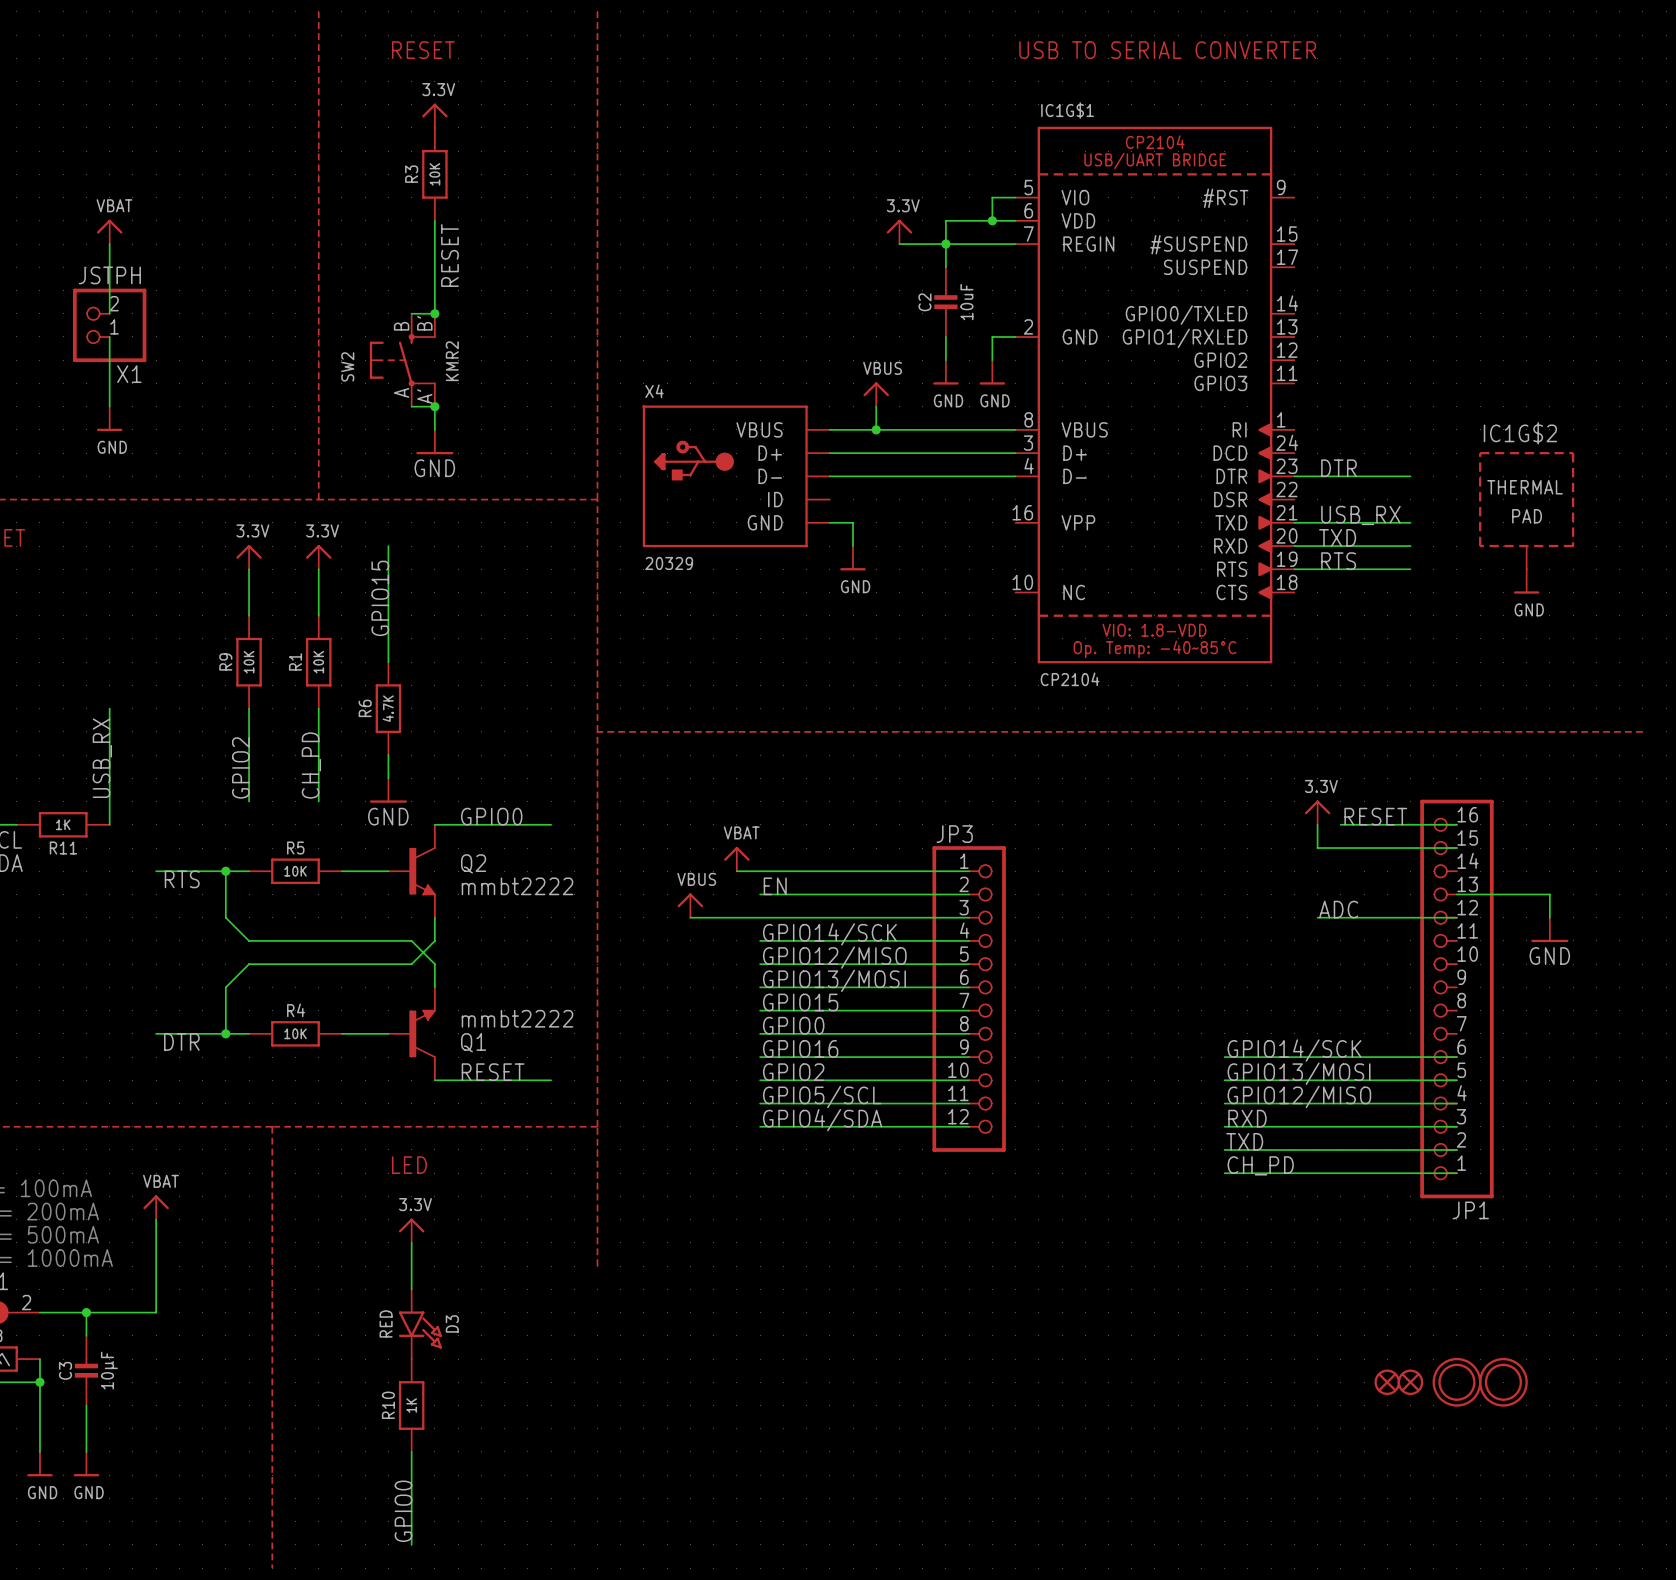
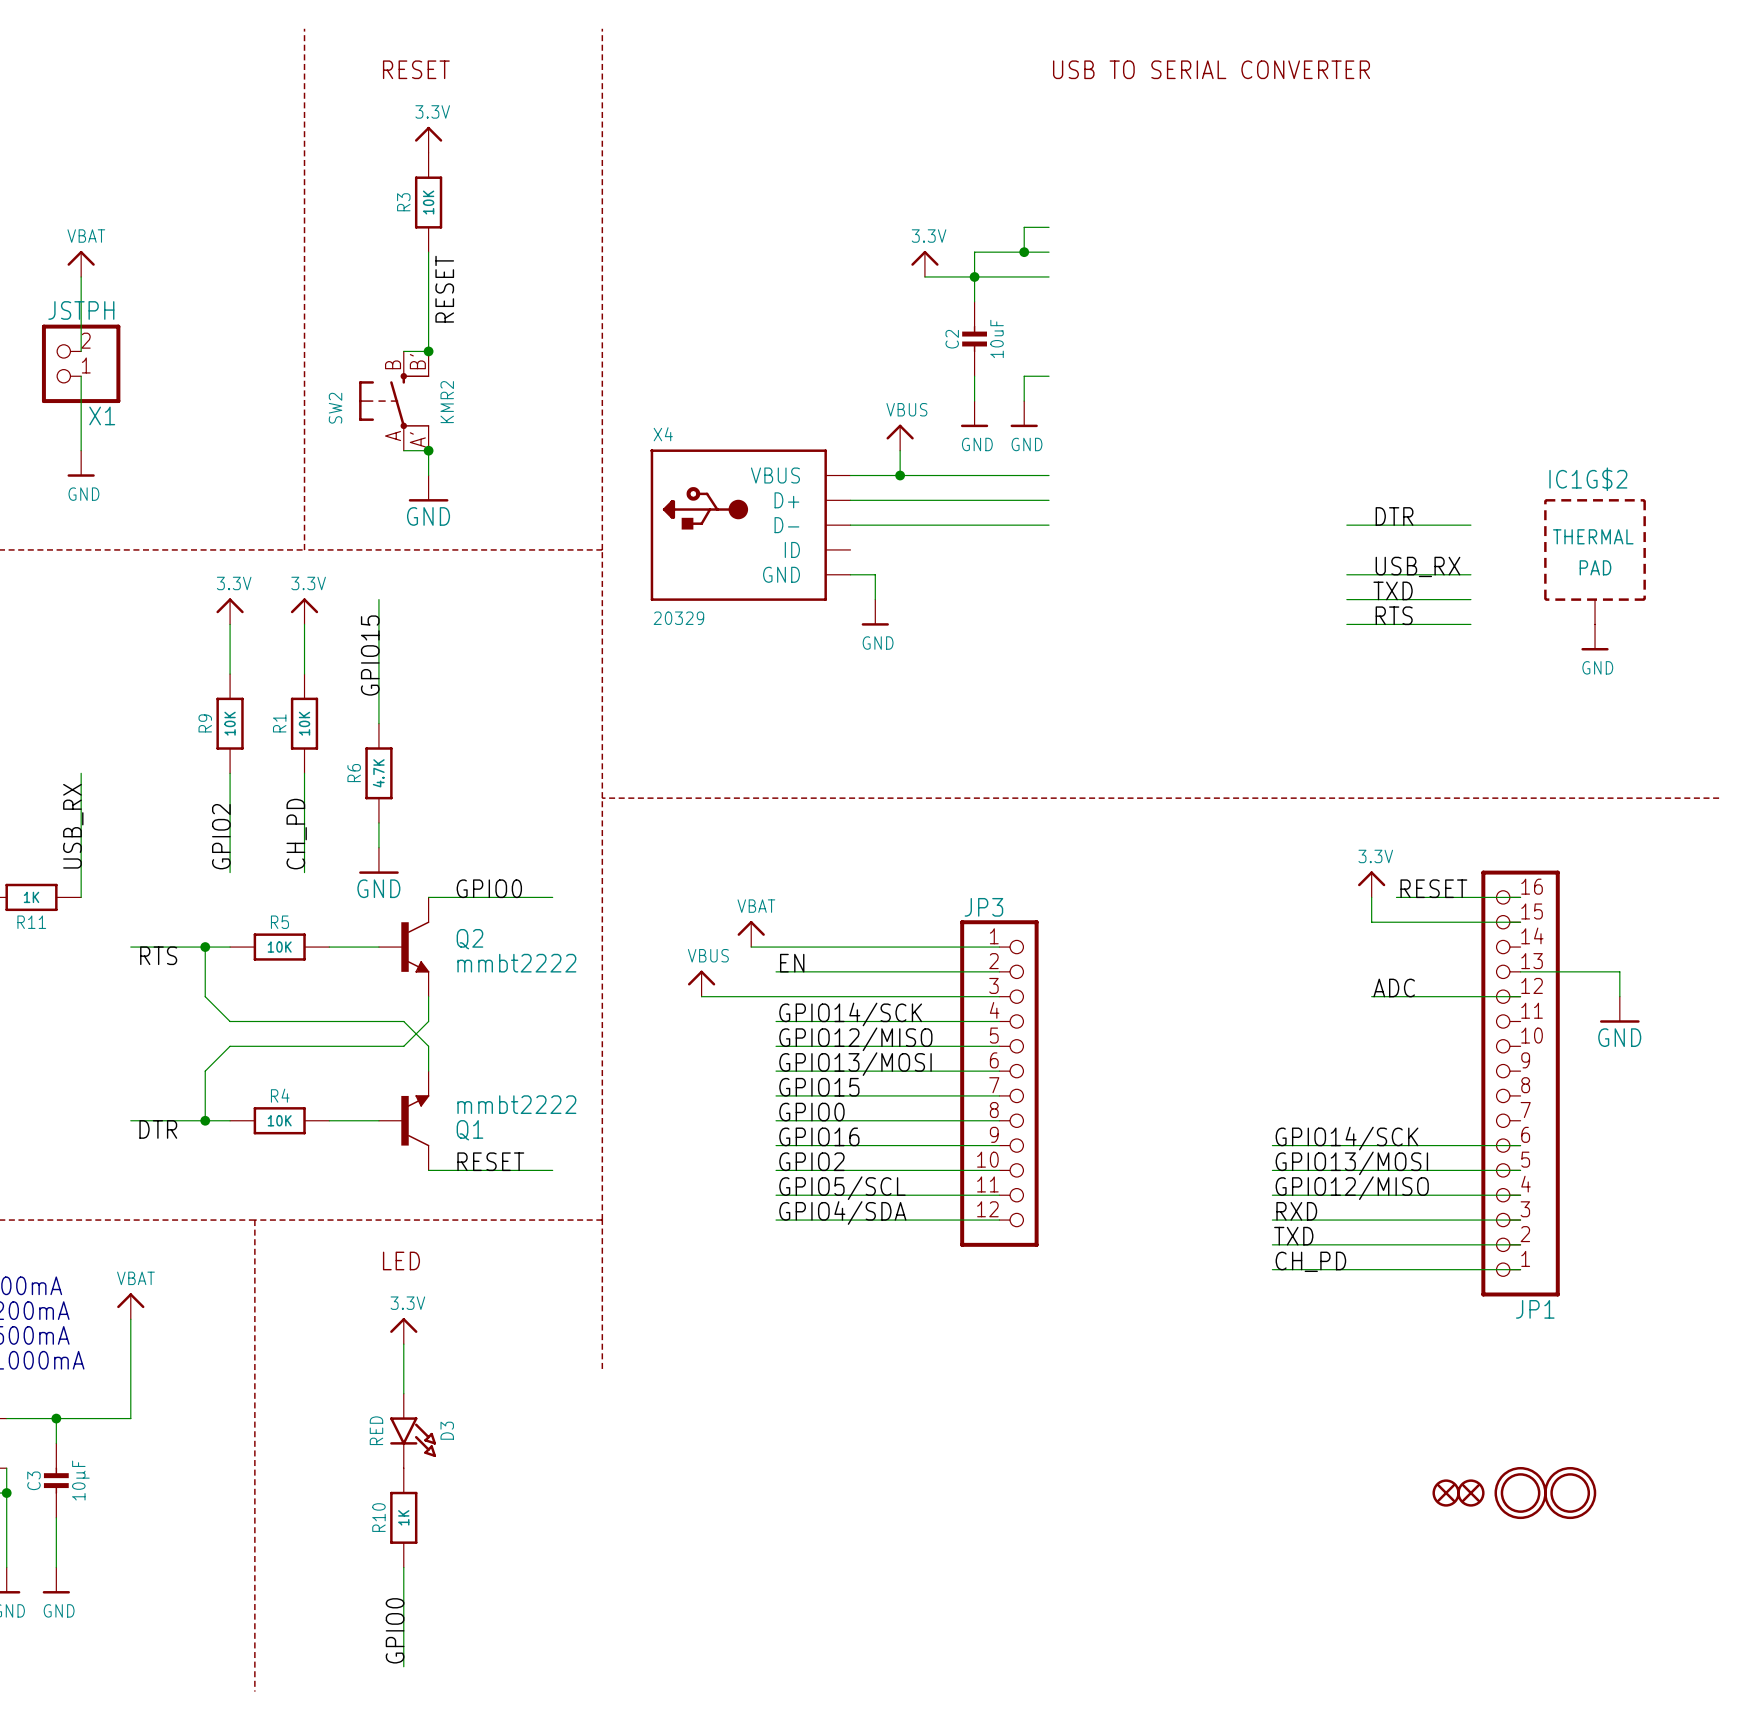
IC1G$1: CP2104 (1154, 395) -> none

